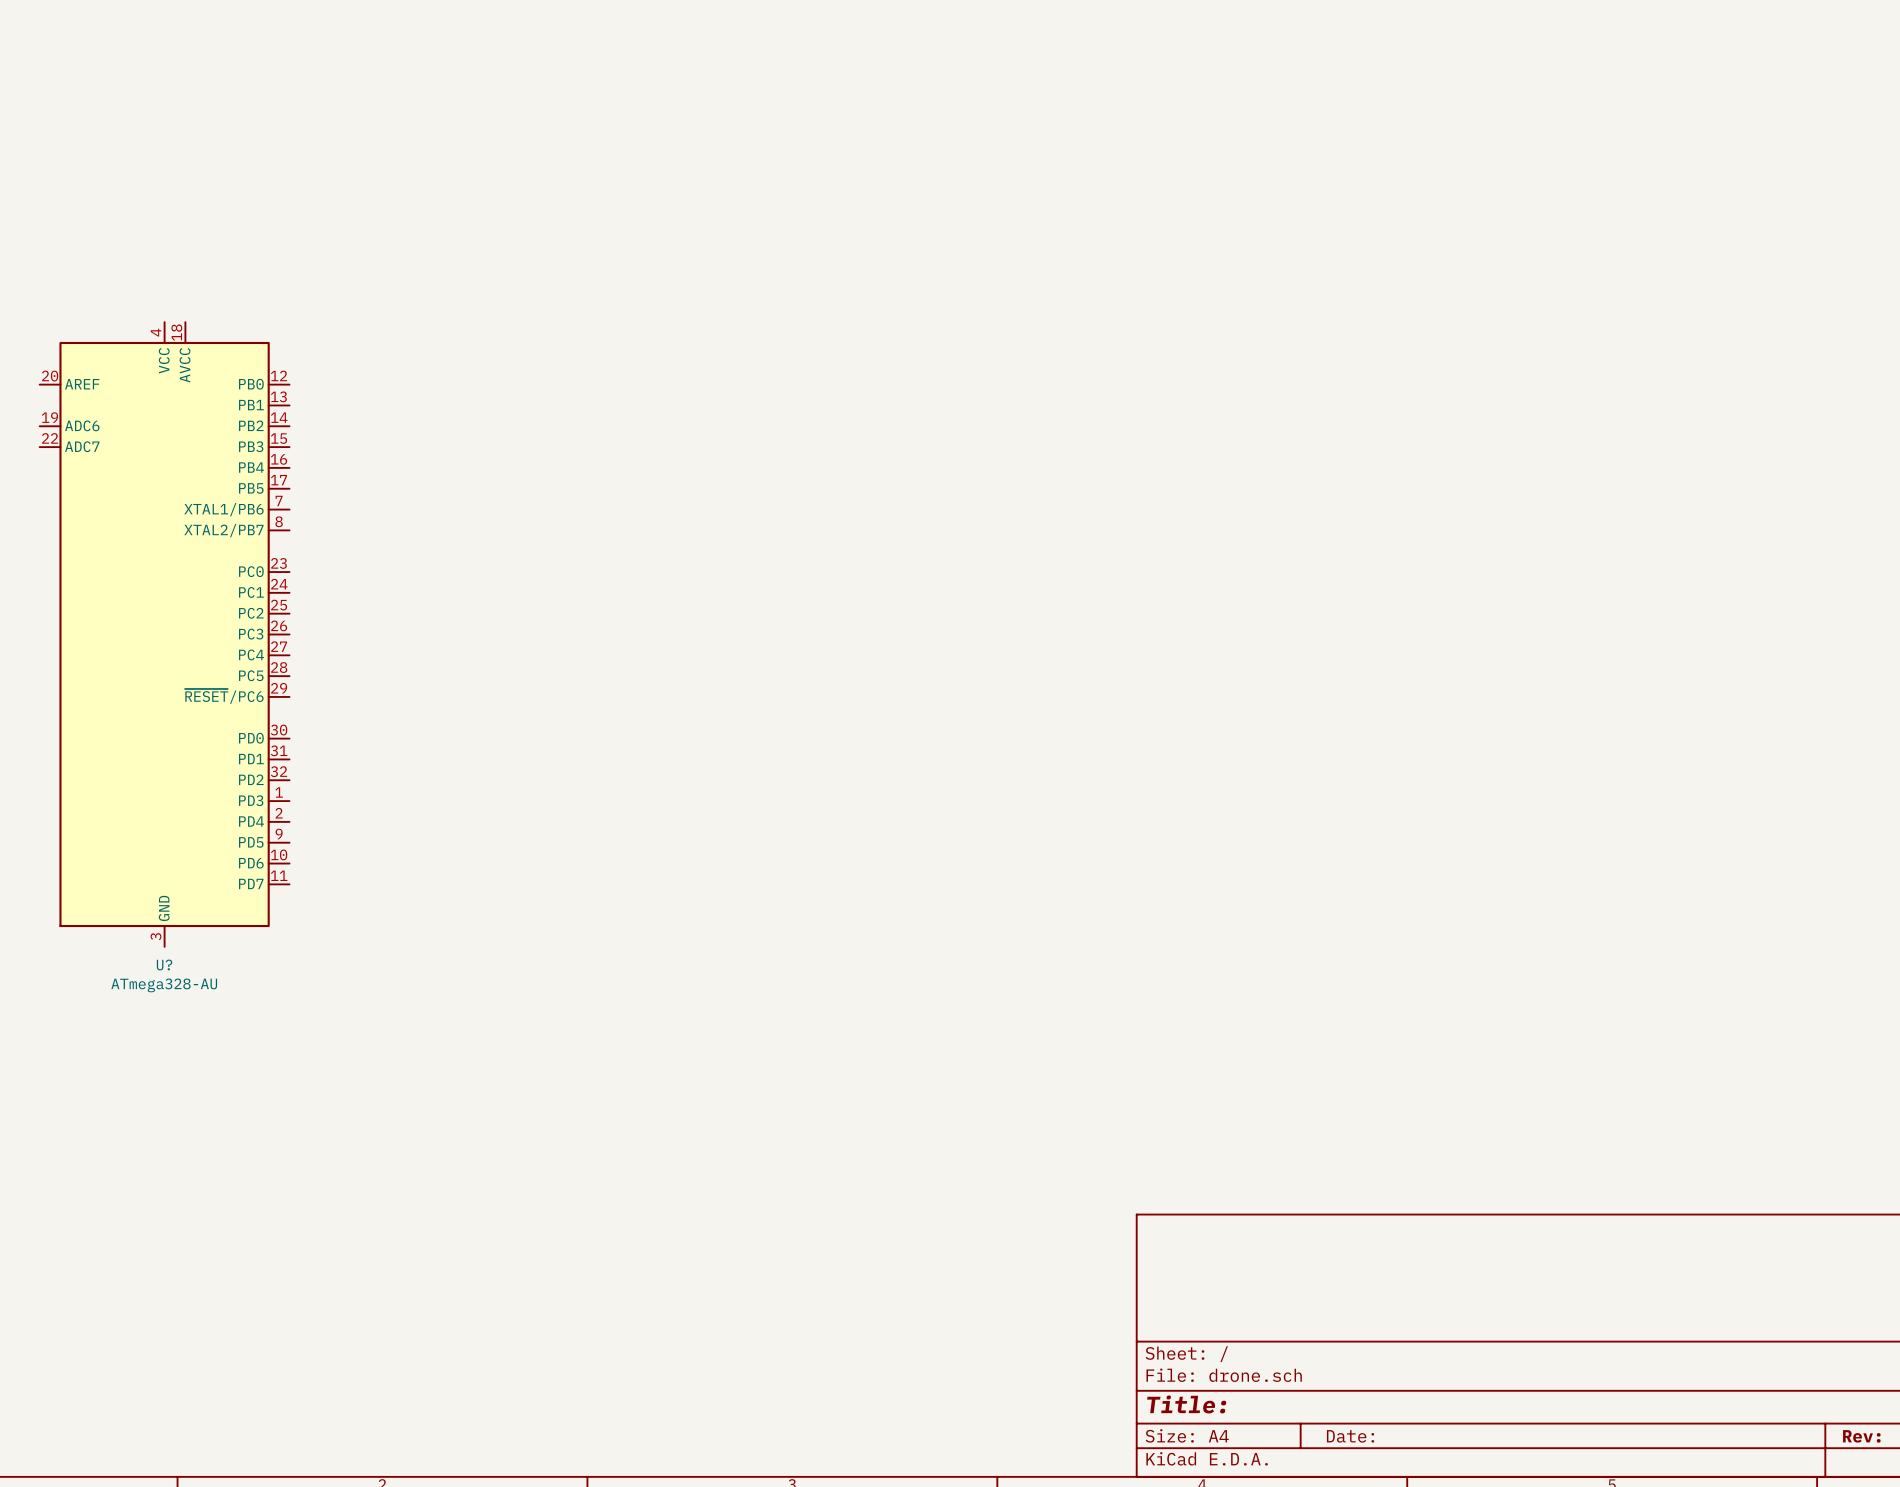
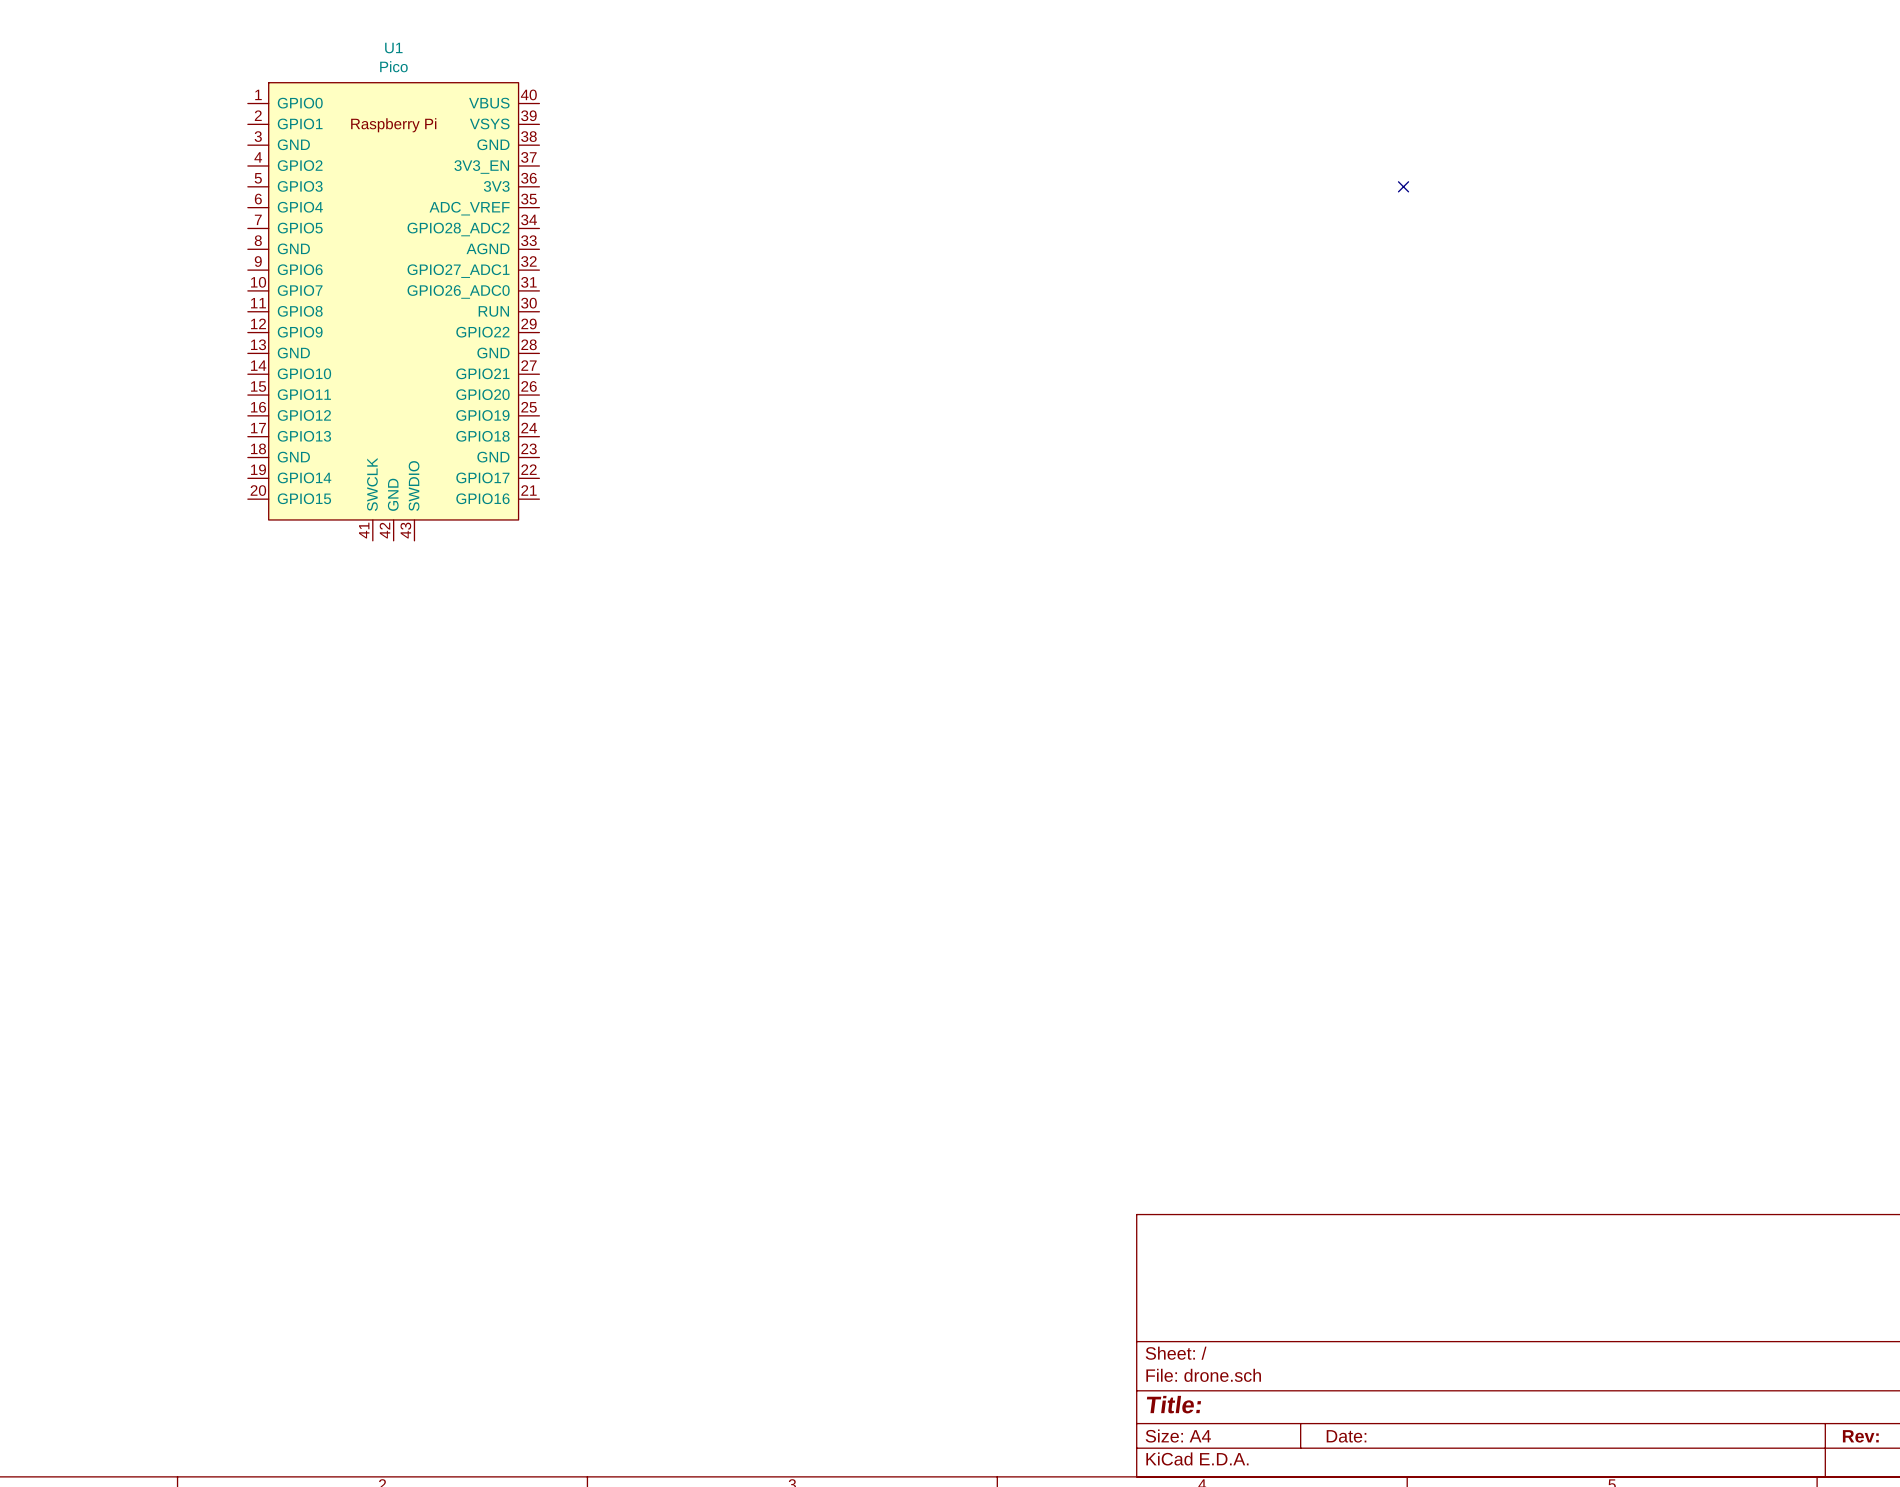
no-connect mark: none -> (1403, 186)
U1: none -> Pico (393, 311)
U?: ATmega328-AU (164, 634) -> none

